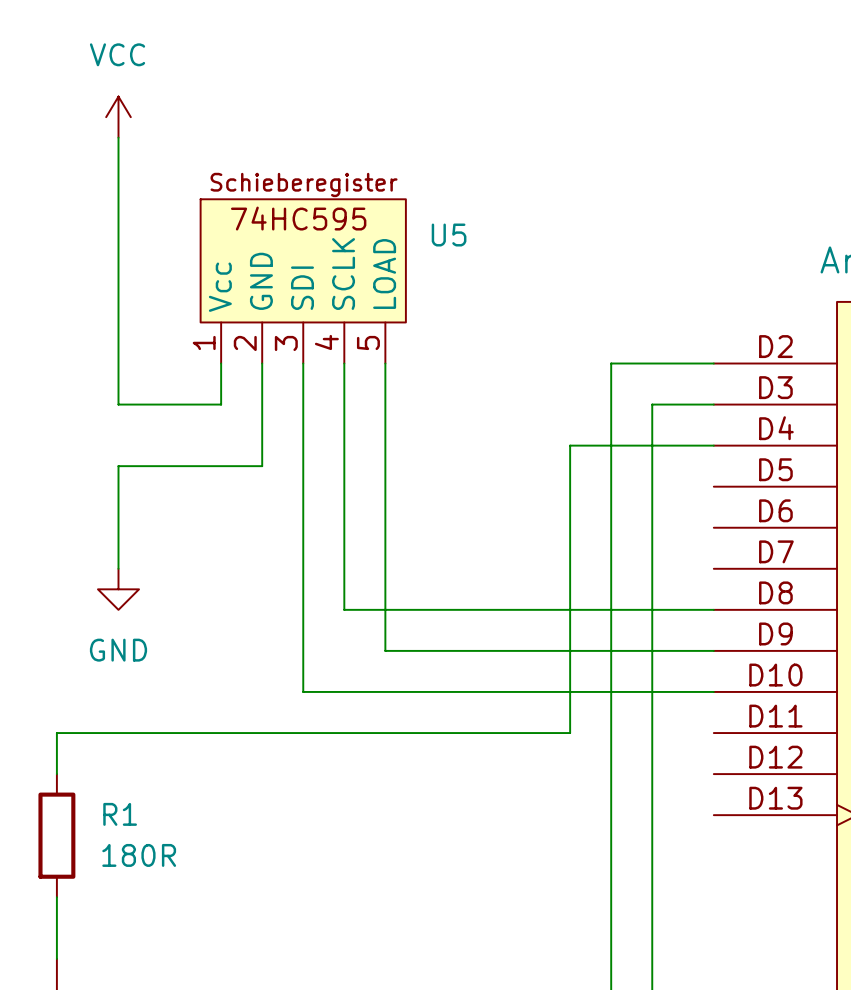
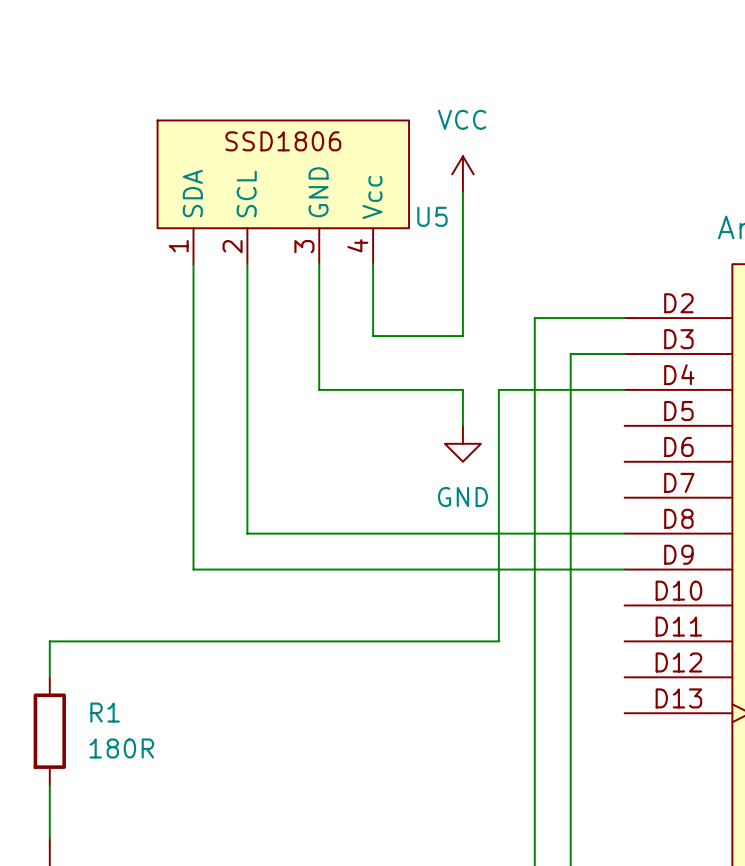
power symbol: VCC (118, 117) -> none
wire: (118, 137) (118, 404) (221, 404) -> none
U5 symbol: [200, 199, 406, 364] -> [157, 120, 410, 265]
power symbol: none -> VCC (462, 174)
wire: none -> (462, 192) (462, 336) (373, 336) (373, 264)
U5 name position: U5 (449, 235) -> U5 (432, 216)
wire: none -> (319, 264) (319, 389) (462, 389) (462, 425)
wire: (262, 363) (262, 466) (118, 466) (118, 568) -> none
wire: (303, 363) (303, 691) (713, 691) -> none
wire: (344, 363) (344, 609) -> (247, 264) (247, 533) (301, 533)
wire: (385, 363) (385, 650) -> (193, 353) (193, 569) (337, 569)
power symbol: none -> GND (462, 443)
power symbol: GND (118, 589) -> none

